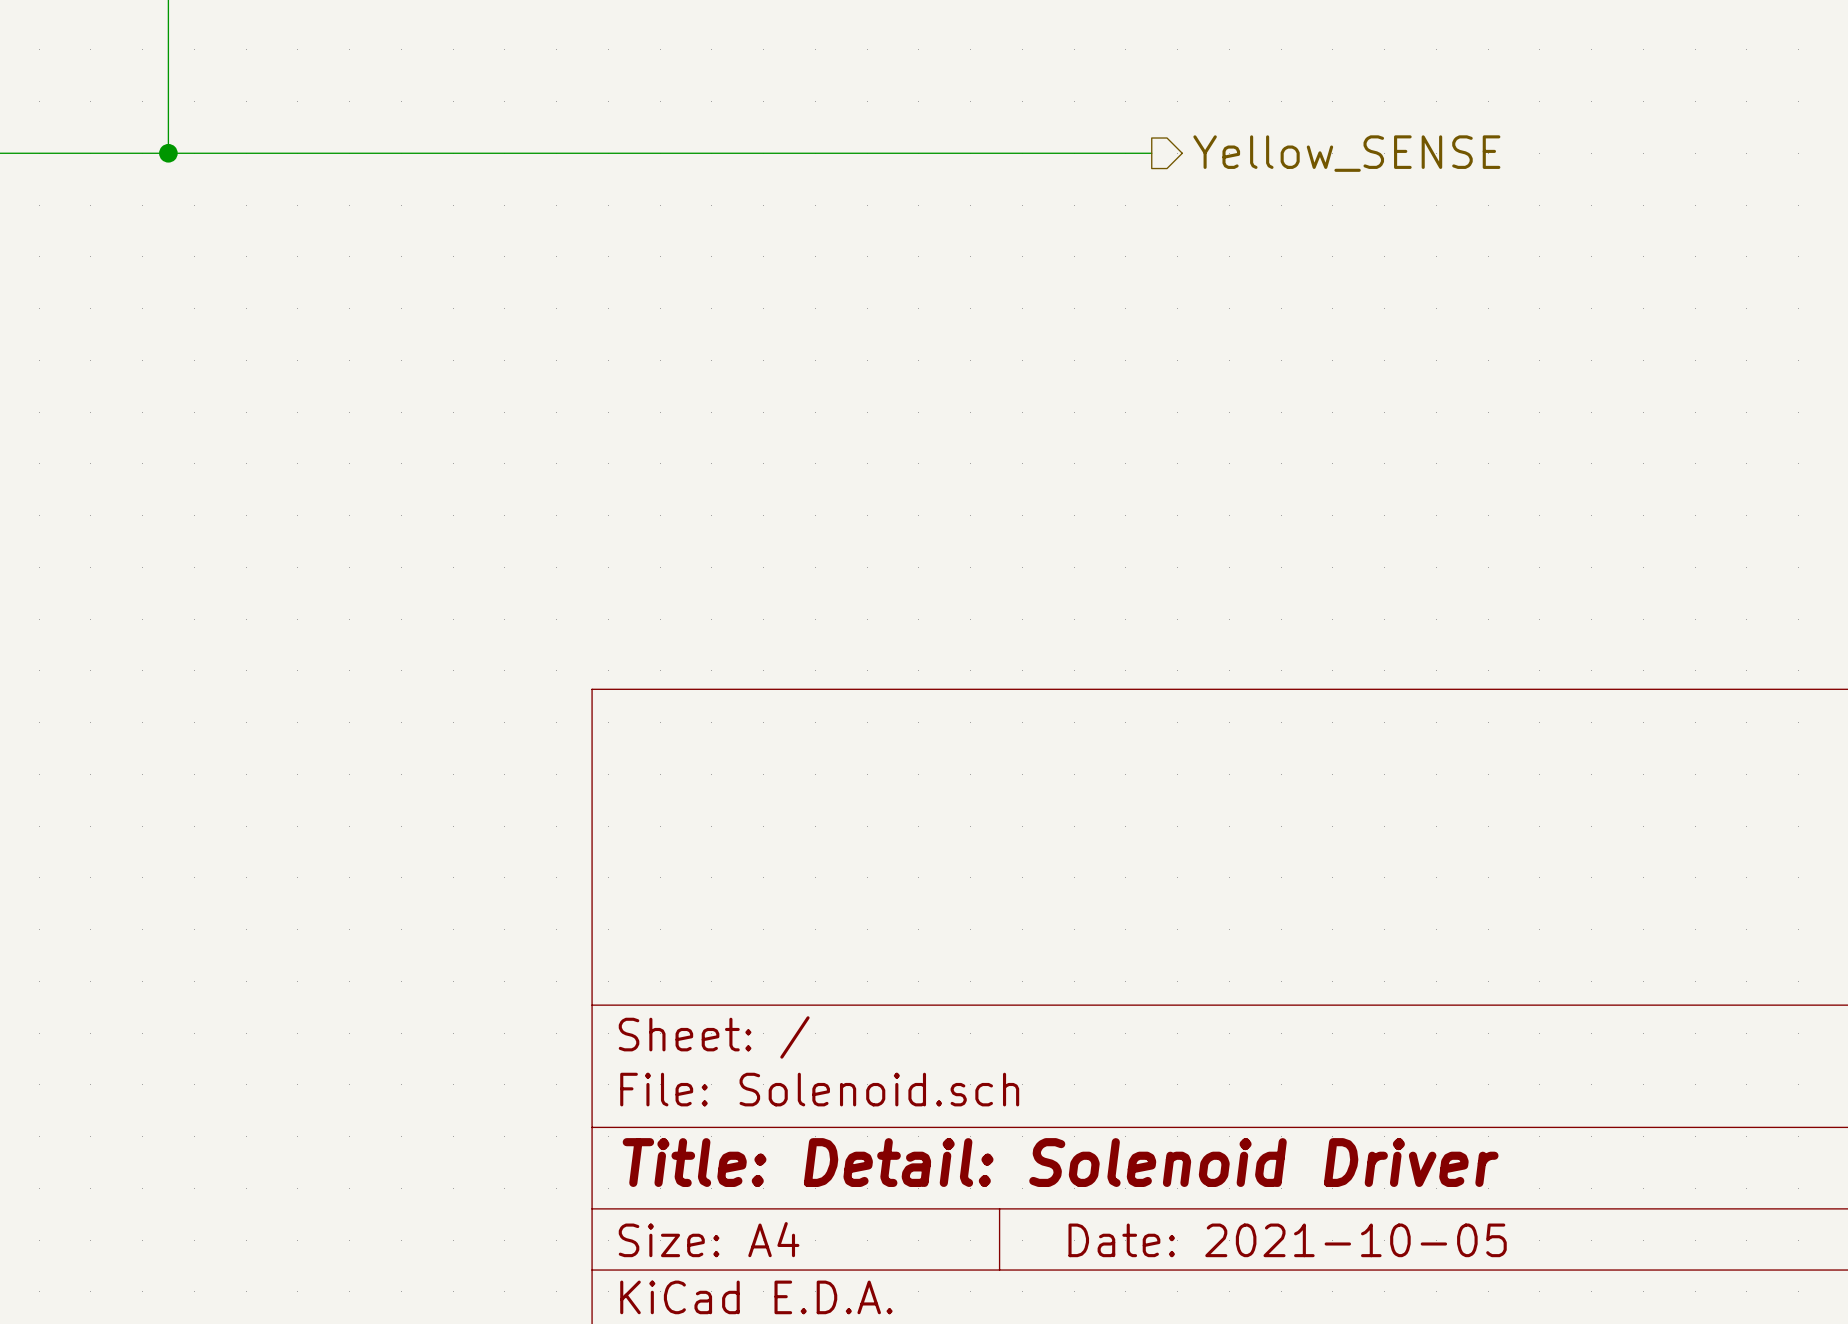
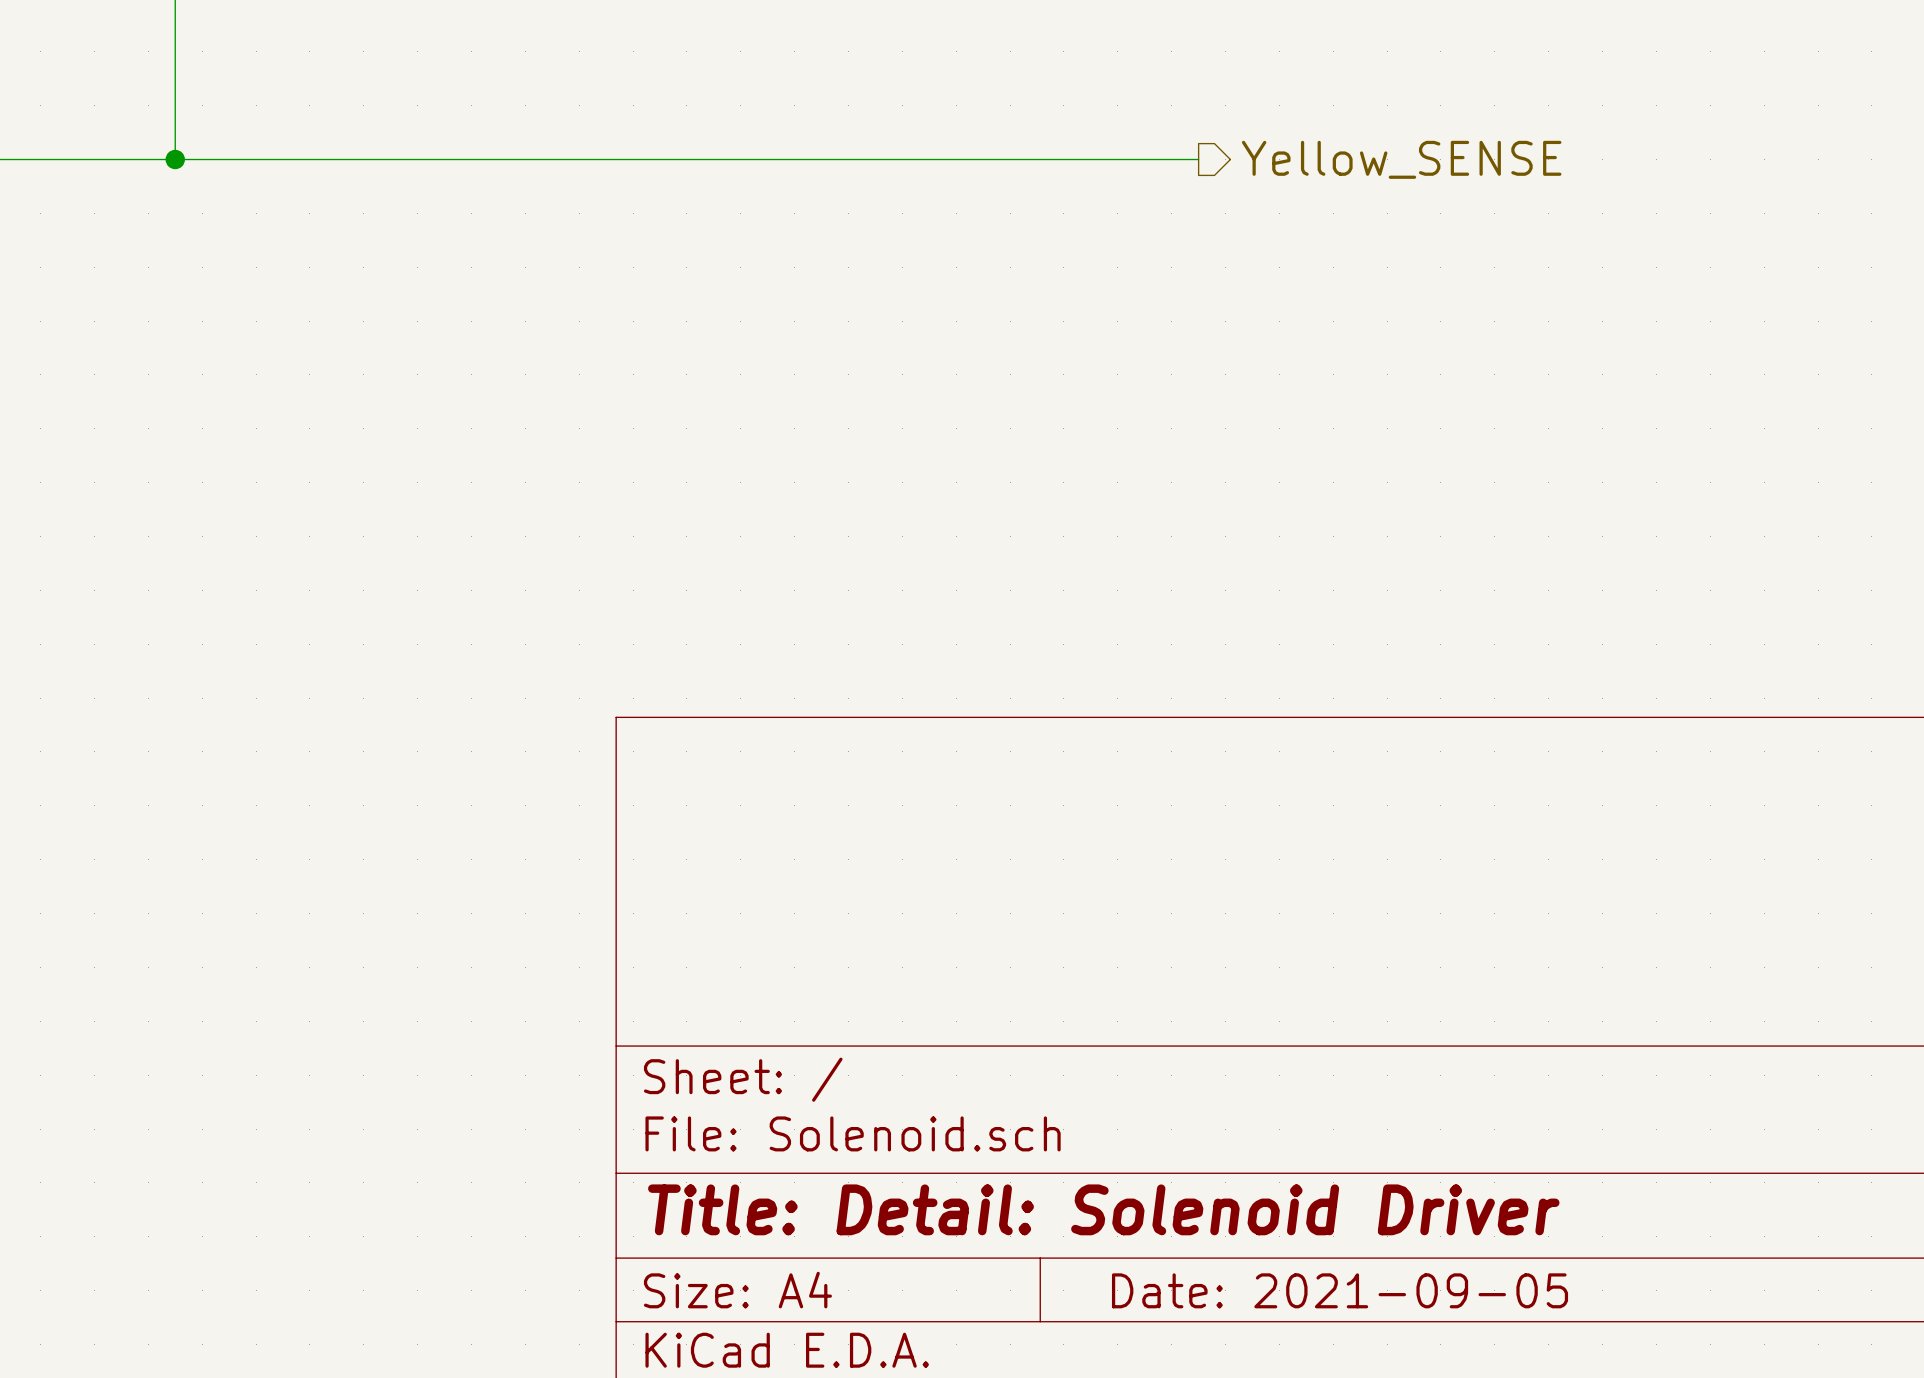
title block: Date: 2021-10-05 (1287, 1240) -> Date: 2021-09-05 (1340, 1290)

